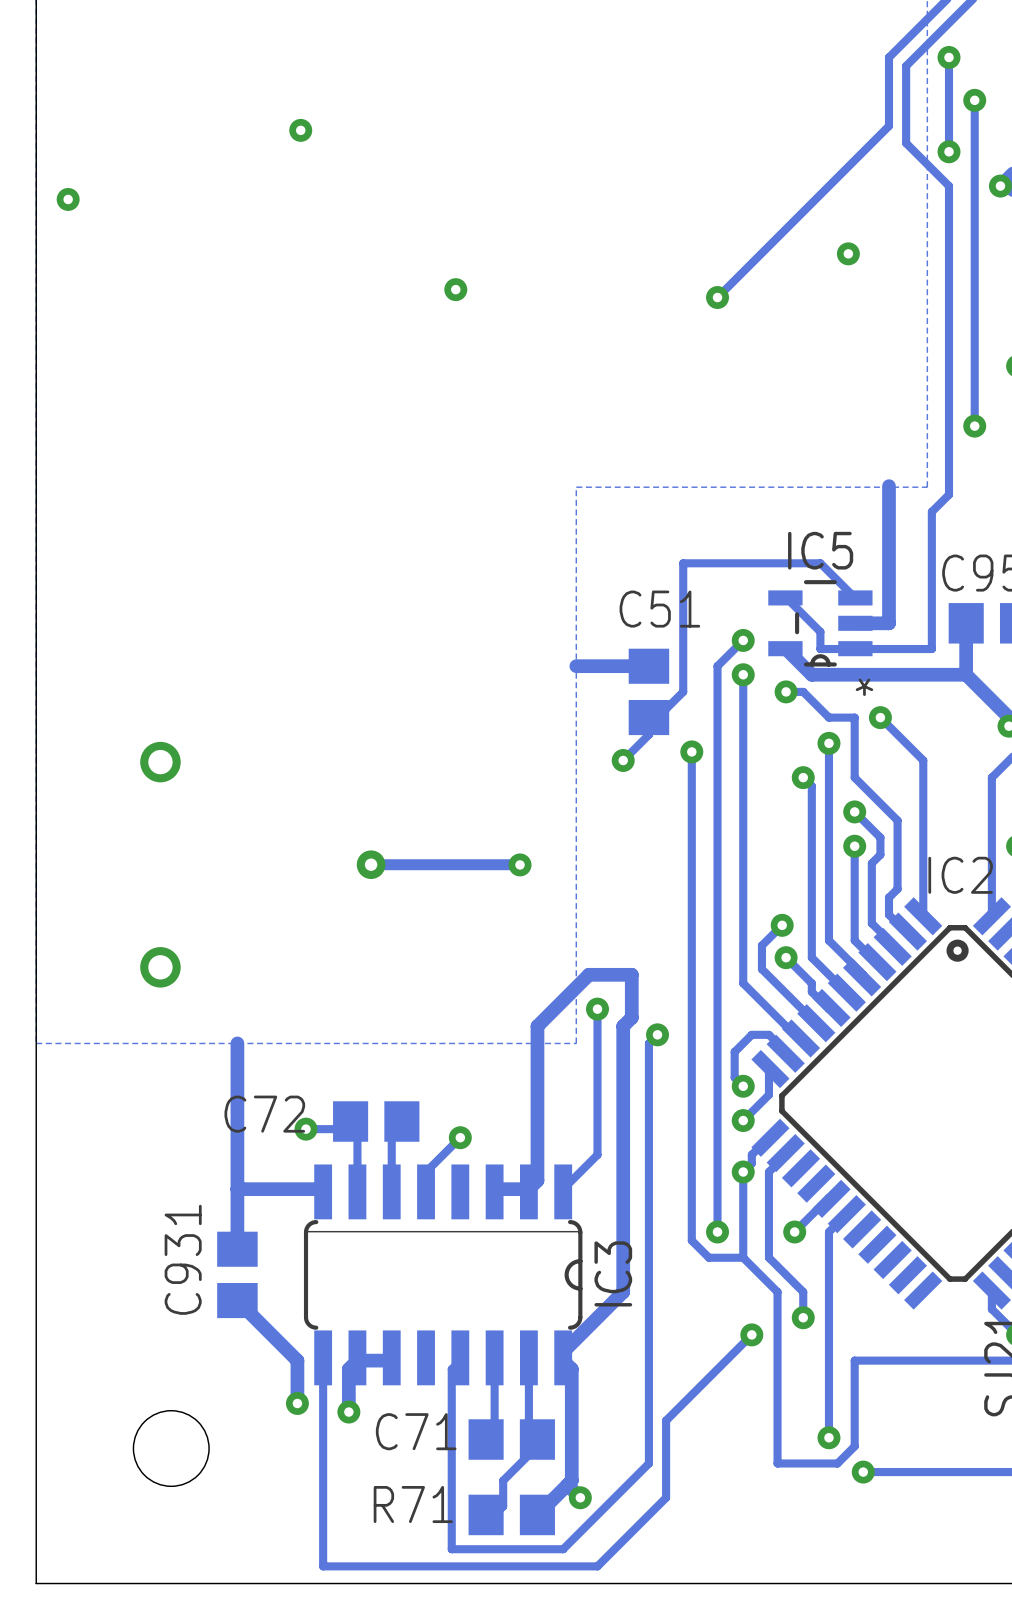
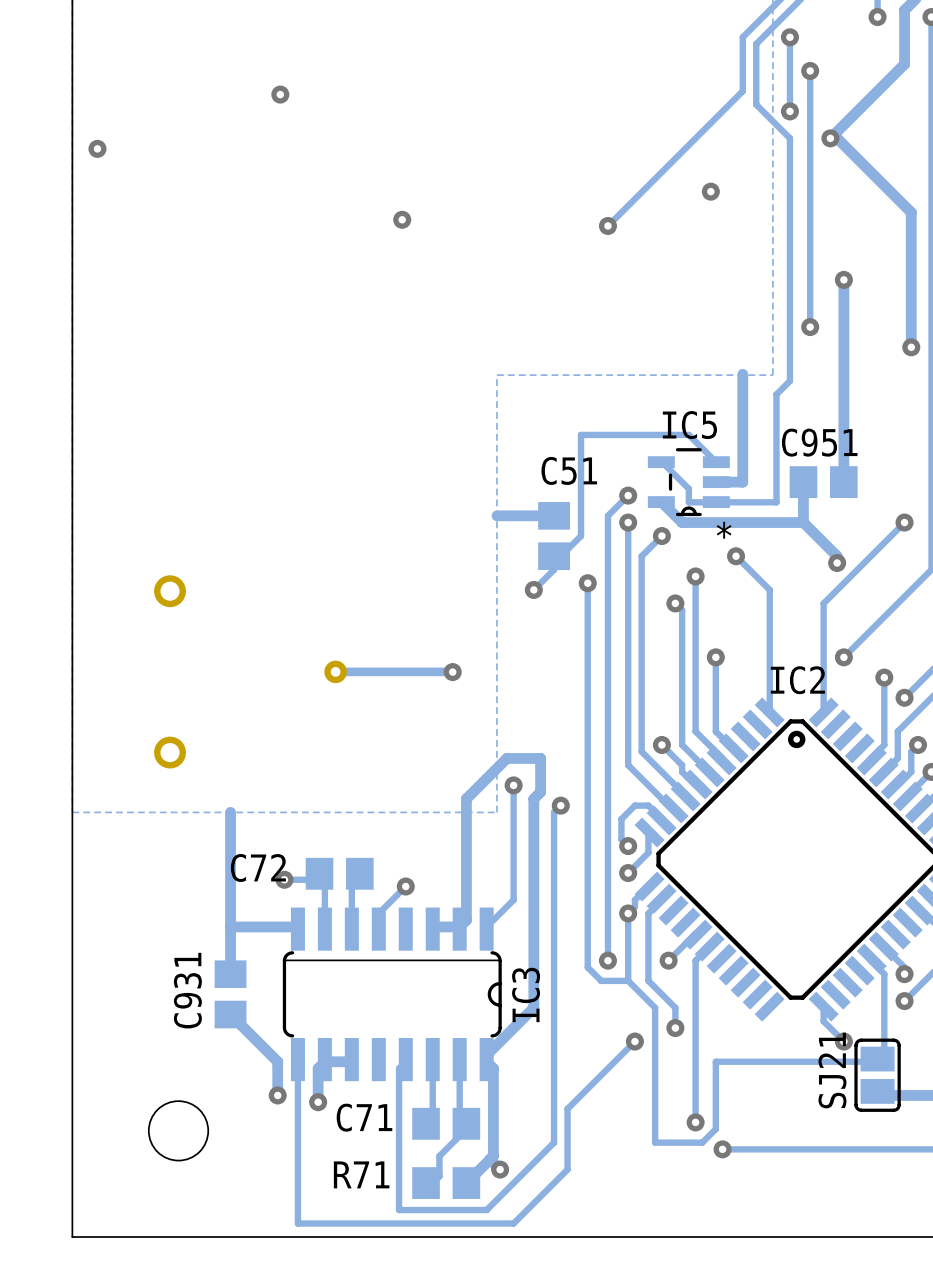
track: (786, 691) (803, 691) (828, 717) (854, 717) (854, 777) (897, 820) (897, 889) (888, 897) (888, 914) (907, 931) -> (661, 536) (641, 556) (641, 751) (685, 796)
track: (854, 811) (880, 837) (880, 854) (871, 863) (871, 923) (892, 946) -> none
via: (854, 811) -> none
track: (782, 925) (761, 945) (761, 969) (815, 1023) -> none
via: (782, 925) -> none

